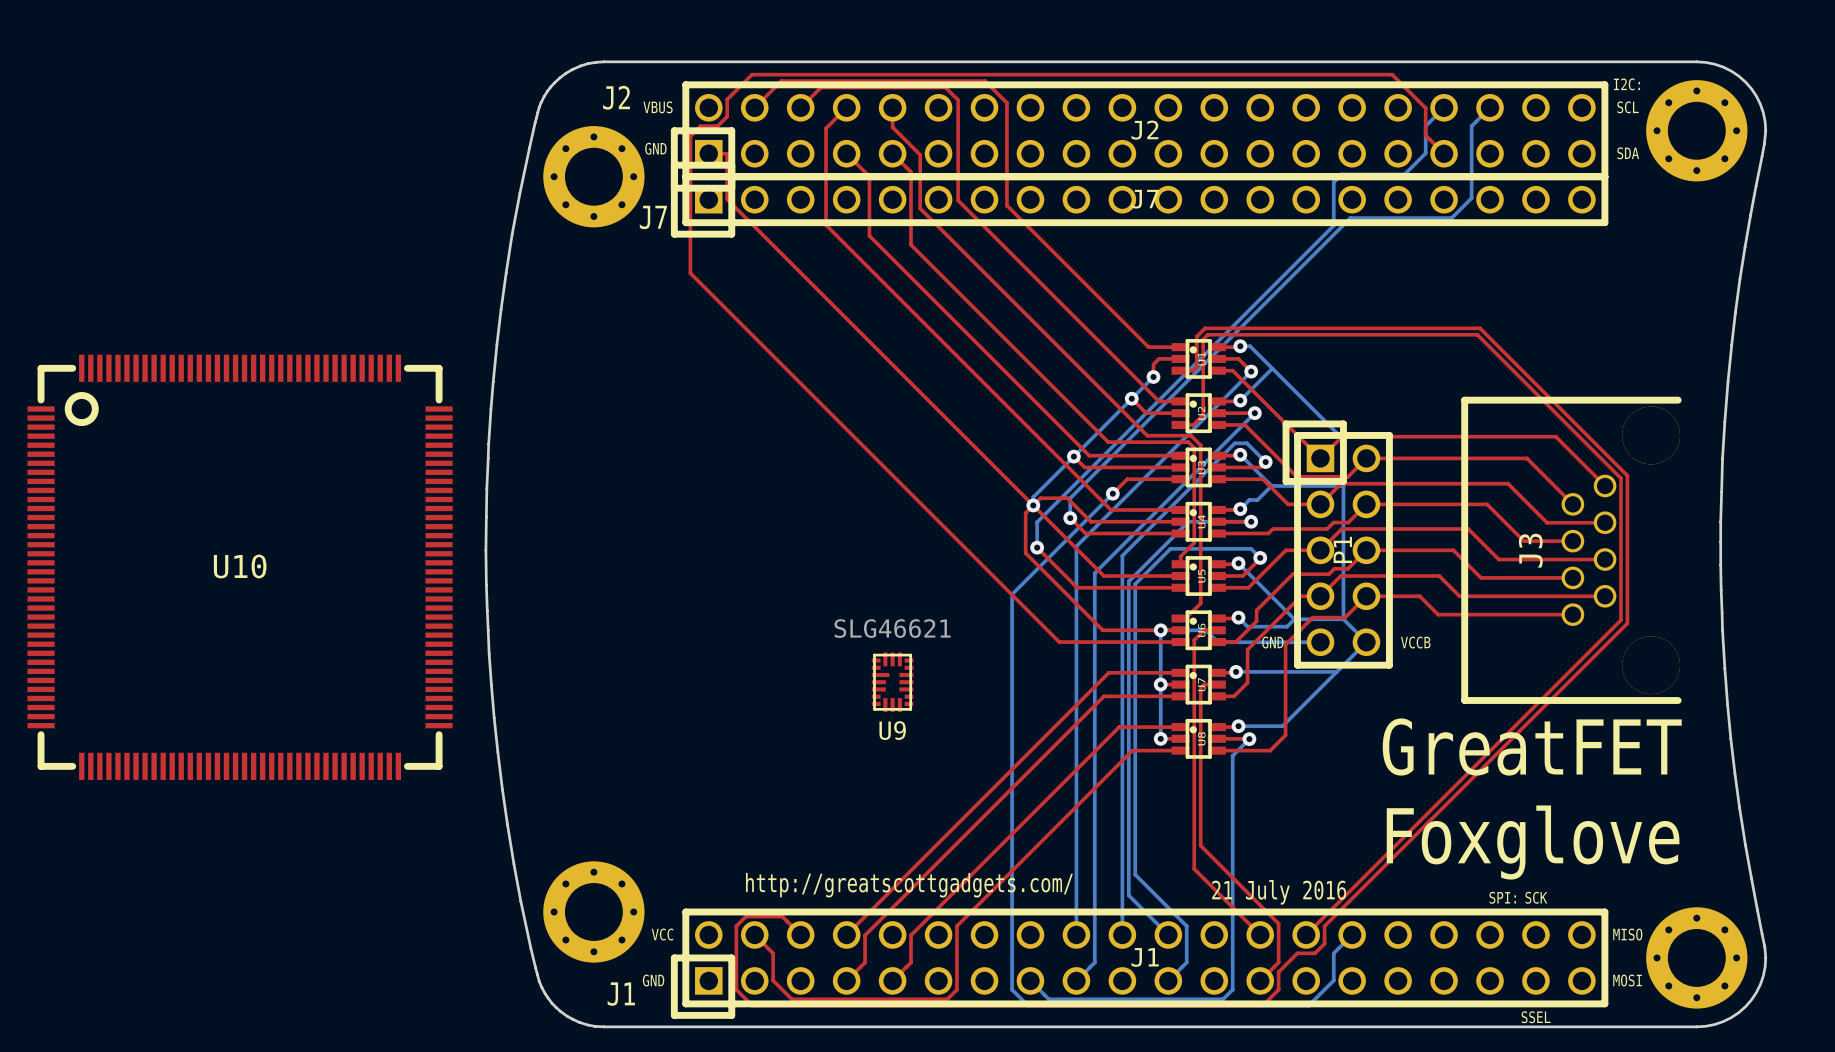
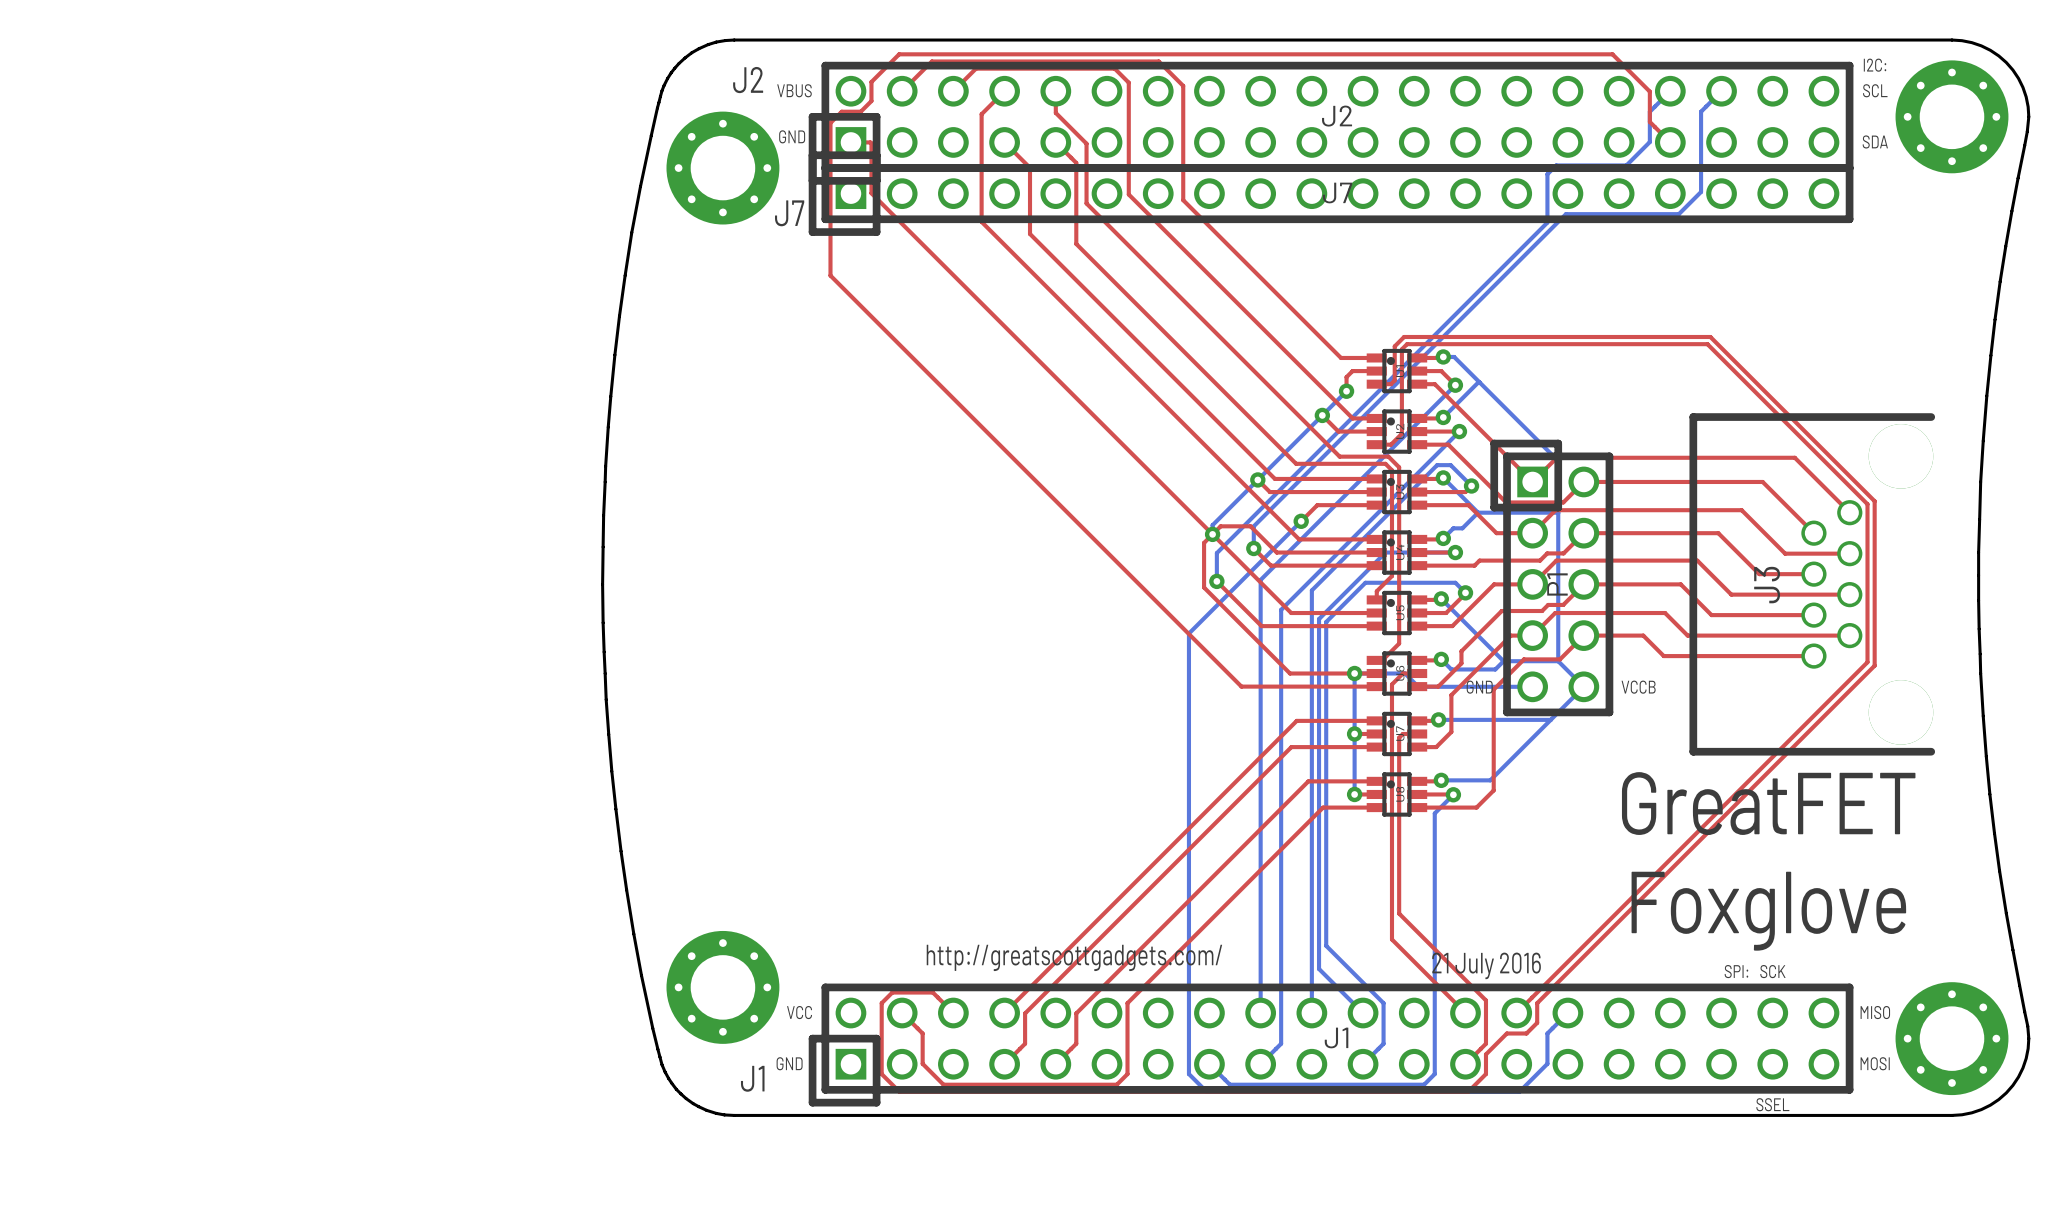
U10: (240, 567) -> none
U9: SLG46621 (892, 682) -> none

